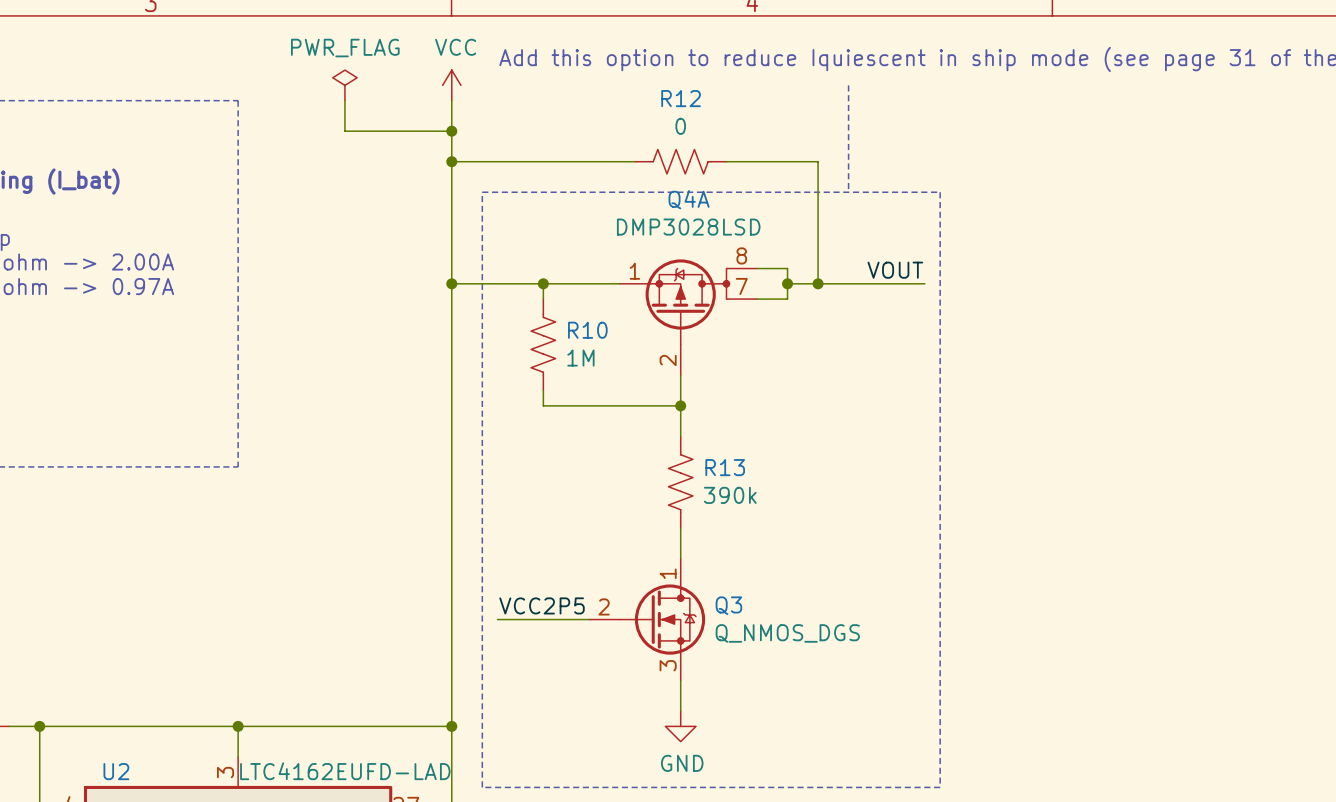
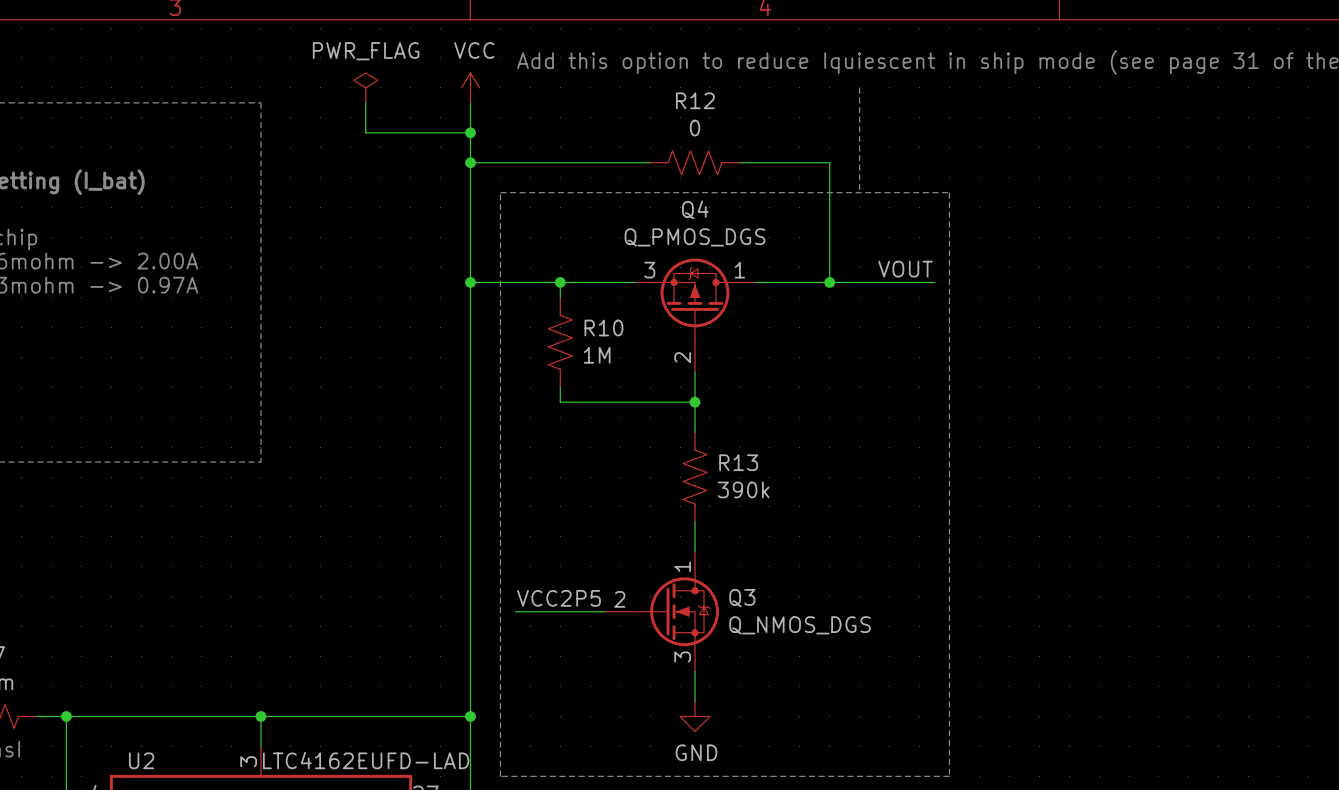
wire: (757, 268) (787, 268) (787, 299) (757, 299) -> none
wire: none -> (754, 282) (799, 282)
junction: (787, 283) -> none
Q4: none -> Q_PMOS_DGS (695, 315)
Q4A: DMP3028LSD (688, 317) -> none

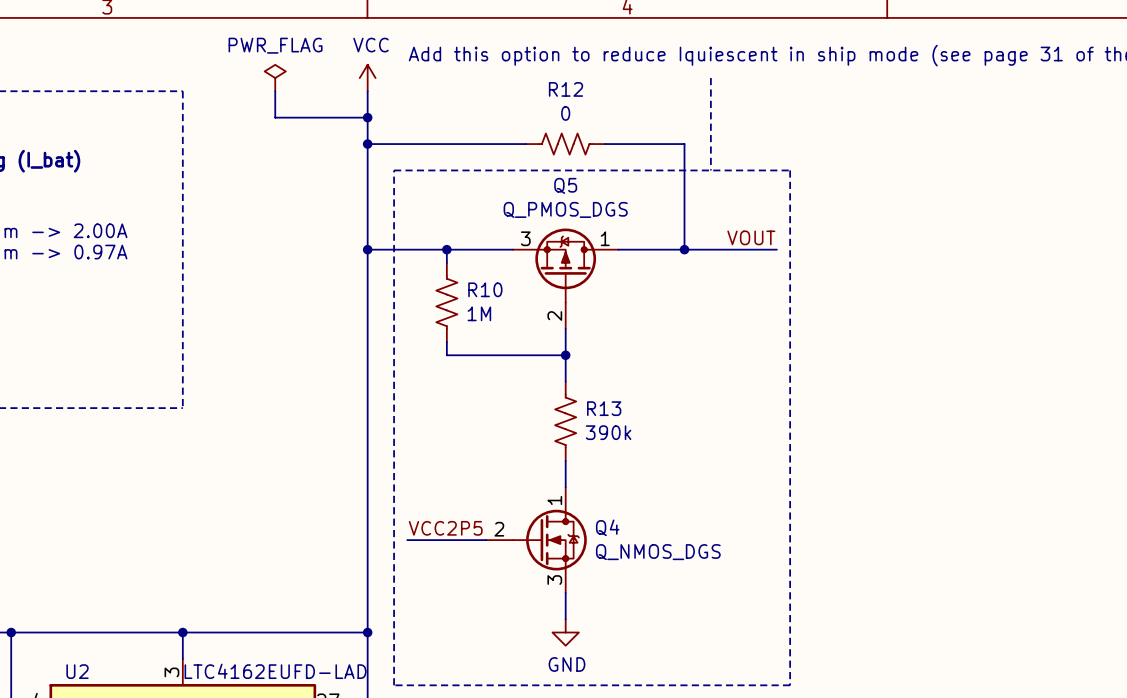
Q4 name: Q4 (695, 209) -> Q5 (565, 185)
Q3 name: Q3 (742, 598) -> Q4 (607, 527)

